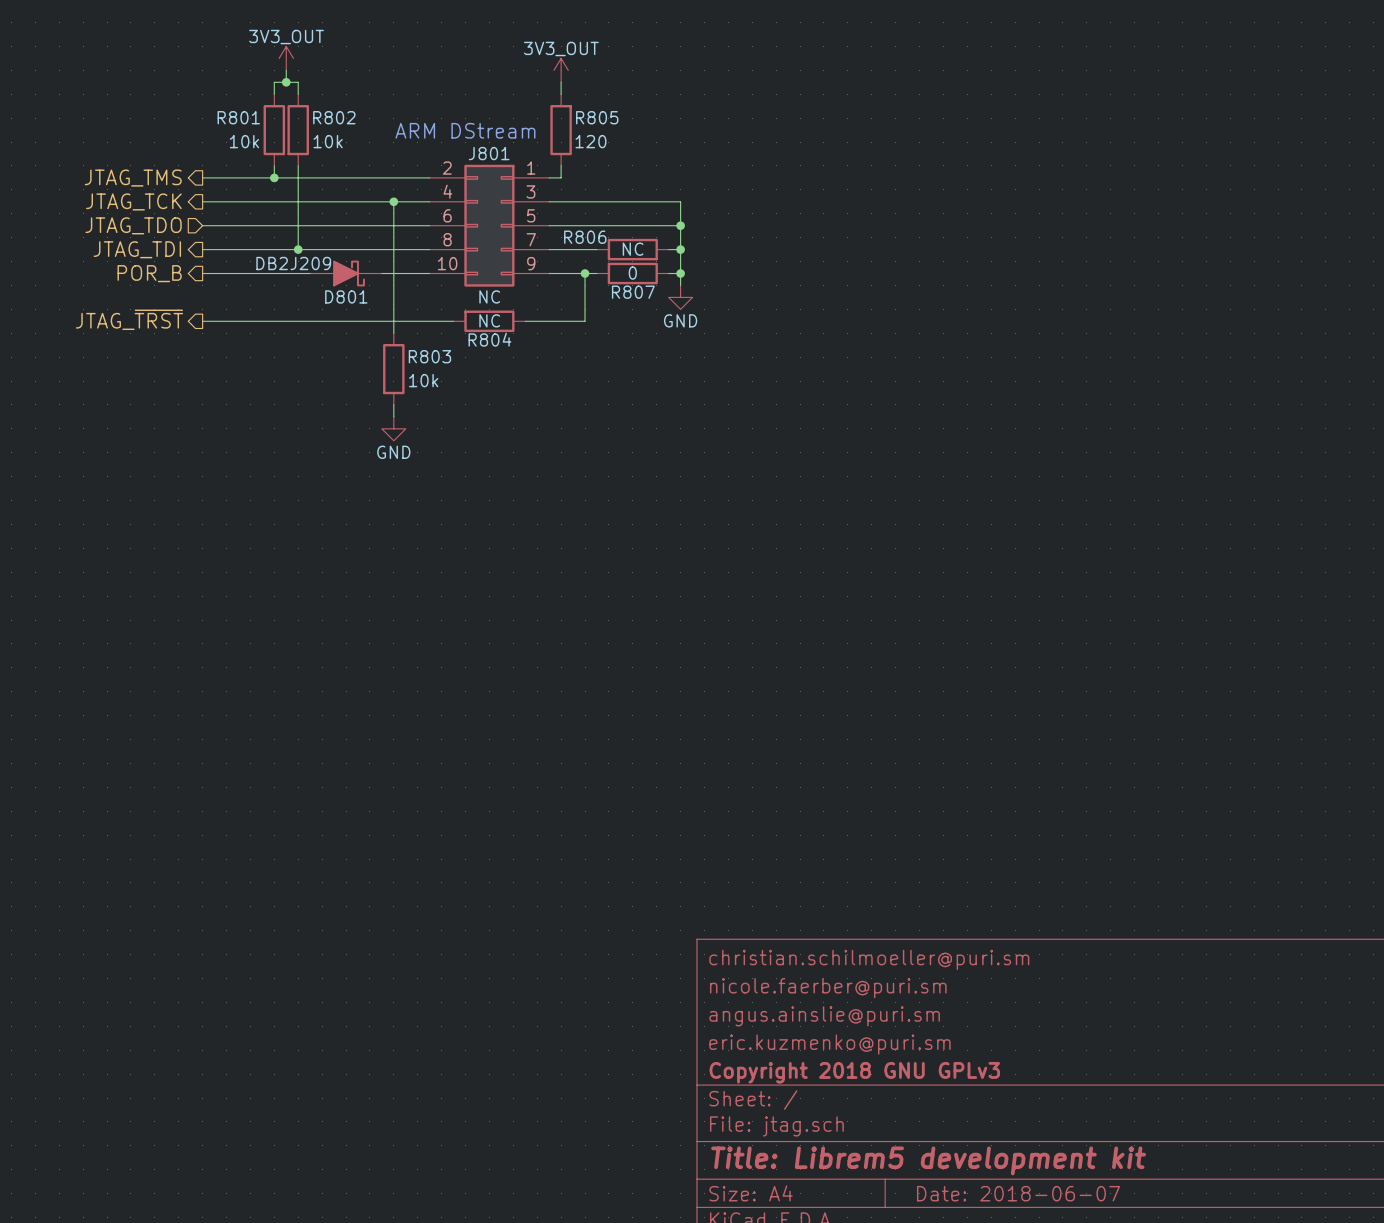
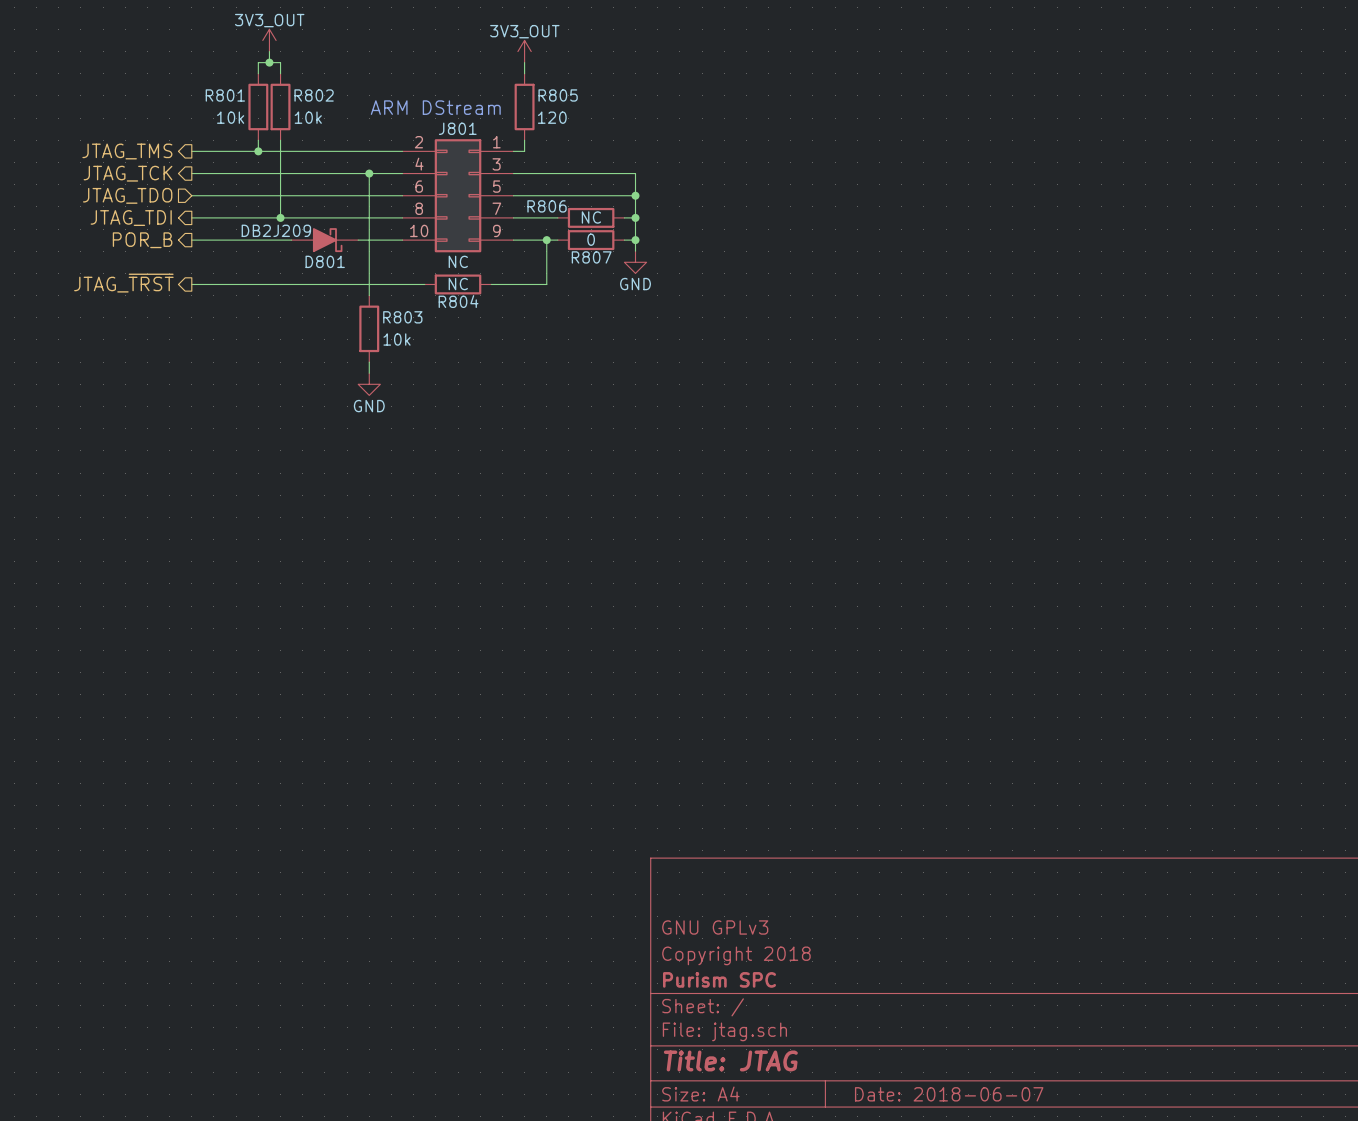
title block: christian.schilmoeller@puri.sm (869, 959) -> none
title block: nicole.faerber@puri.sm (828, 988) -> none
title block: angus.ainslie@puri.sm (824, 1016) -> GNU GPLv3 (715, 927)
title block: eric.kuzmenko@puri.sm (830, 1044) -> Copyright 2018 (736, 955)
title block: Copyright 2018 GNU GPLv3 (854, 1072) -> Purism SPC (719, 979)
title block: Title: Librem5 development kit (928, 1160) -> Title: JTAG (730, 1060)

